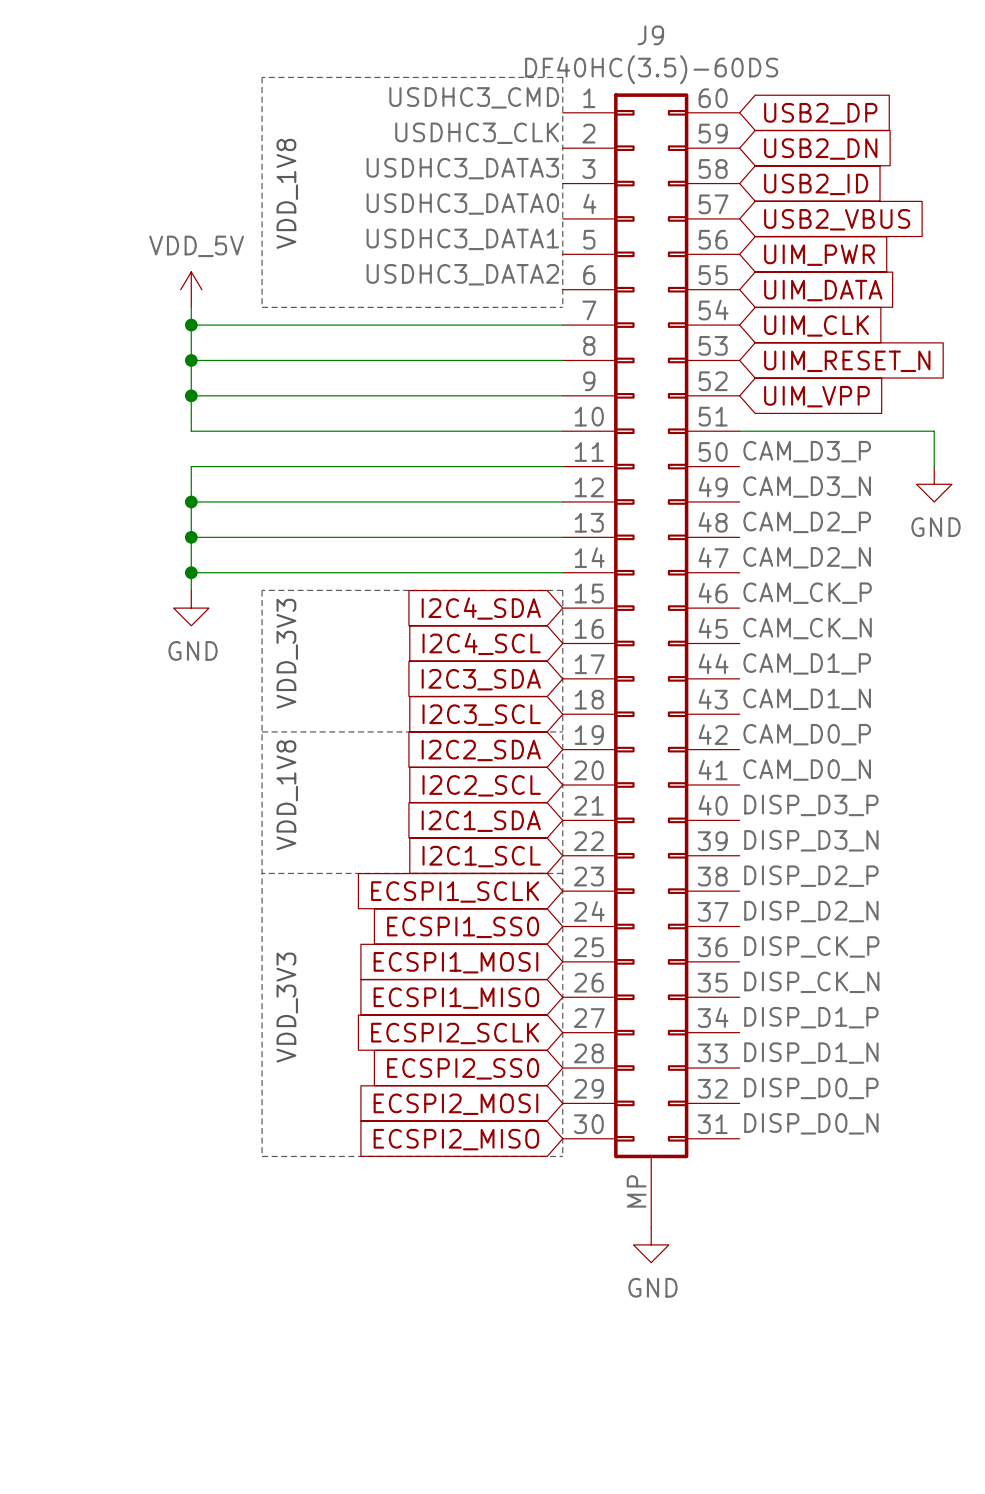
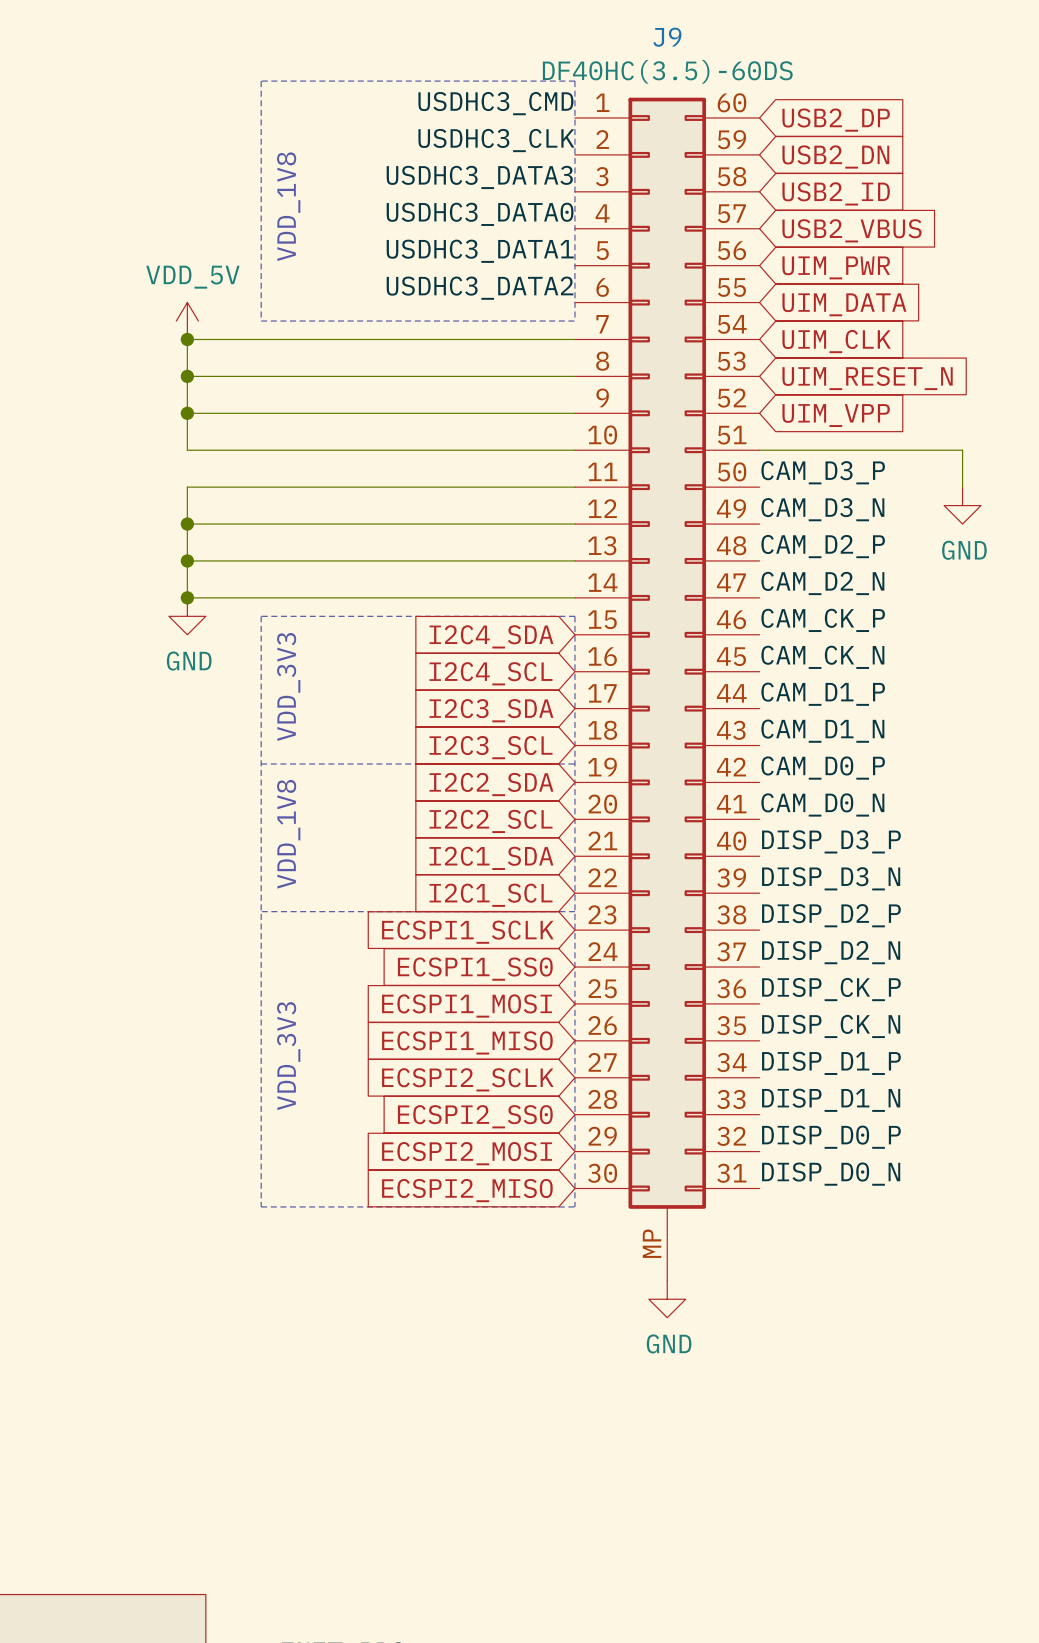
power symbol position: VDD_5V (191, 289) -> VDD_5V (187, 321)
power symbol position: GND (191, 608) -> GND (187, 616)

